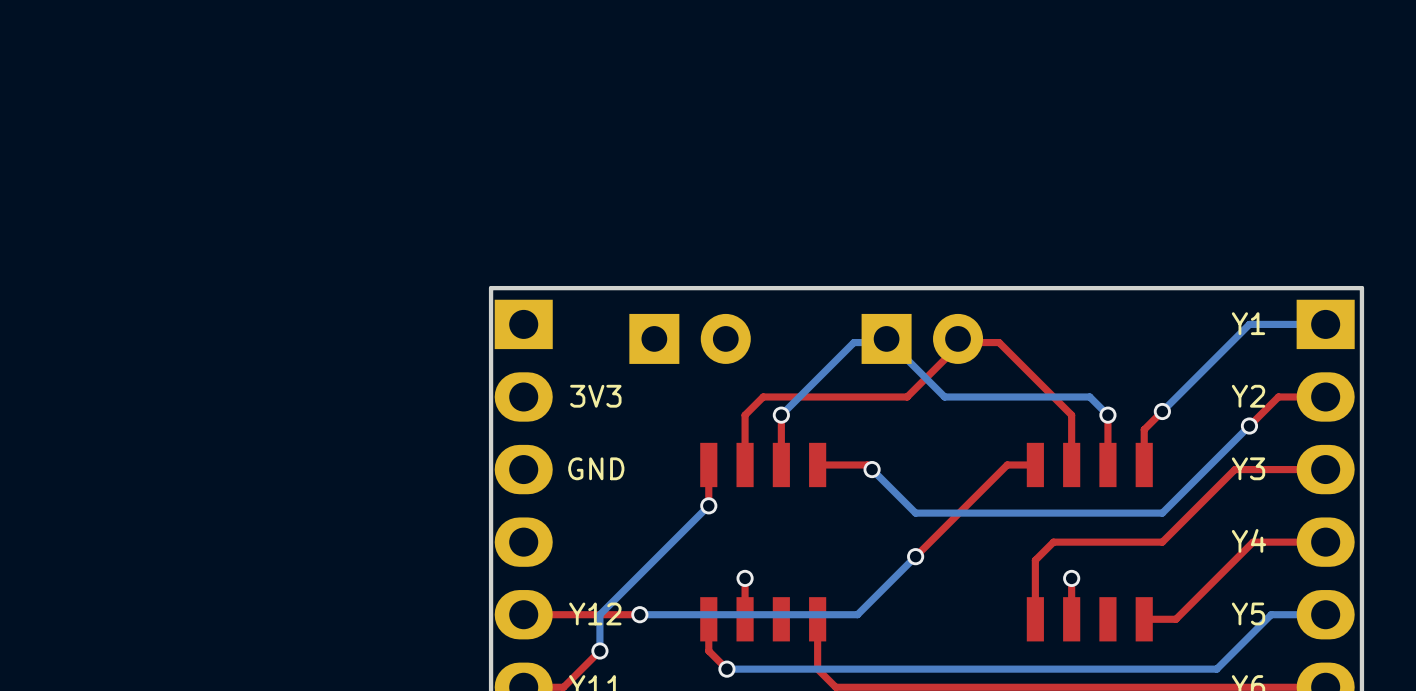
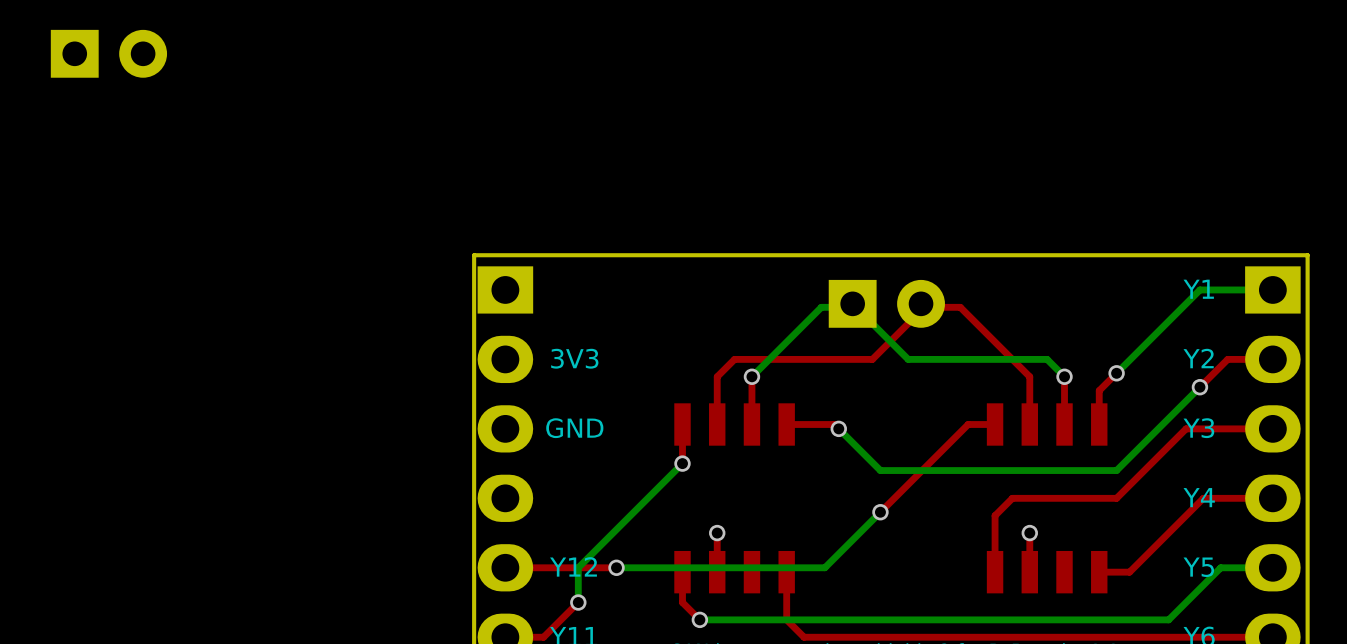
part position: (690, 338) -> (108, 53)

